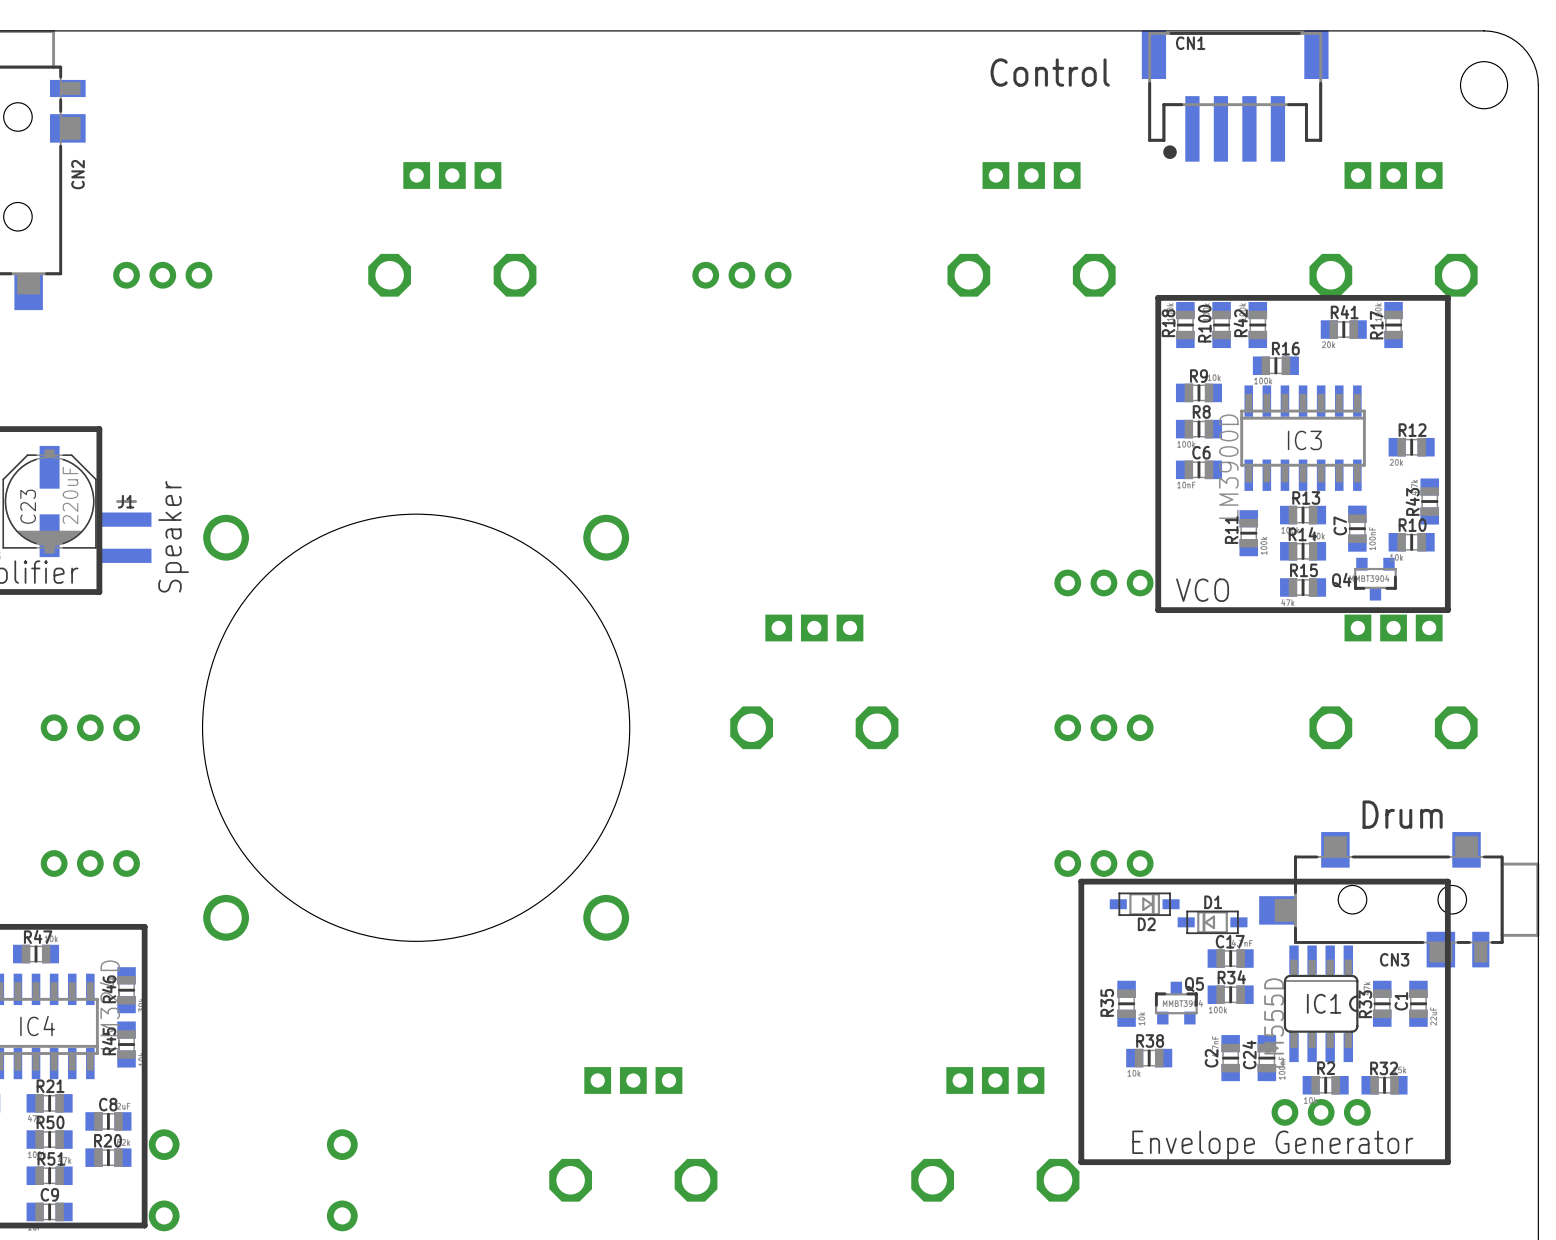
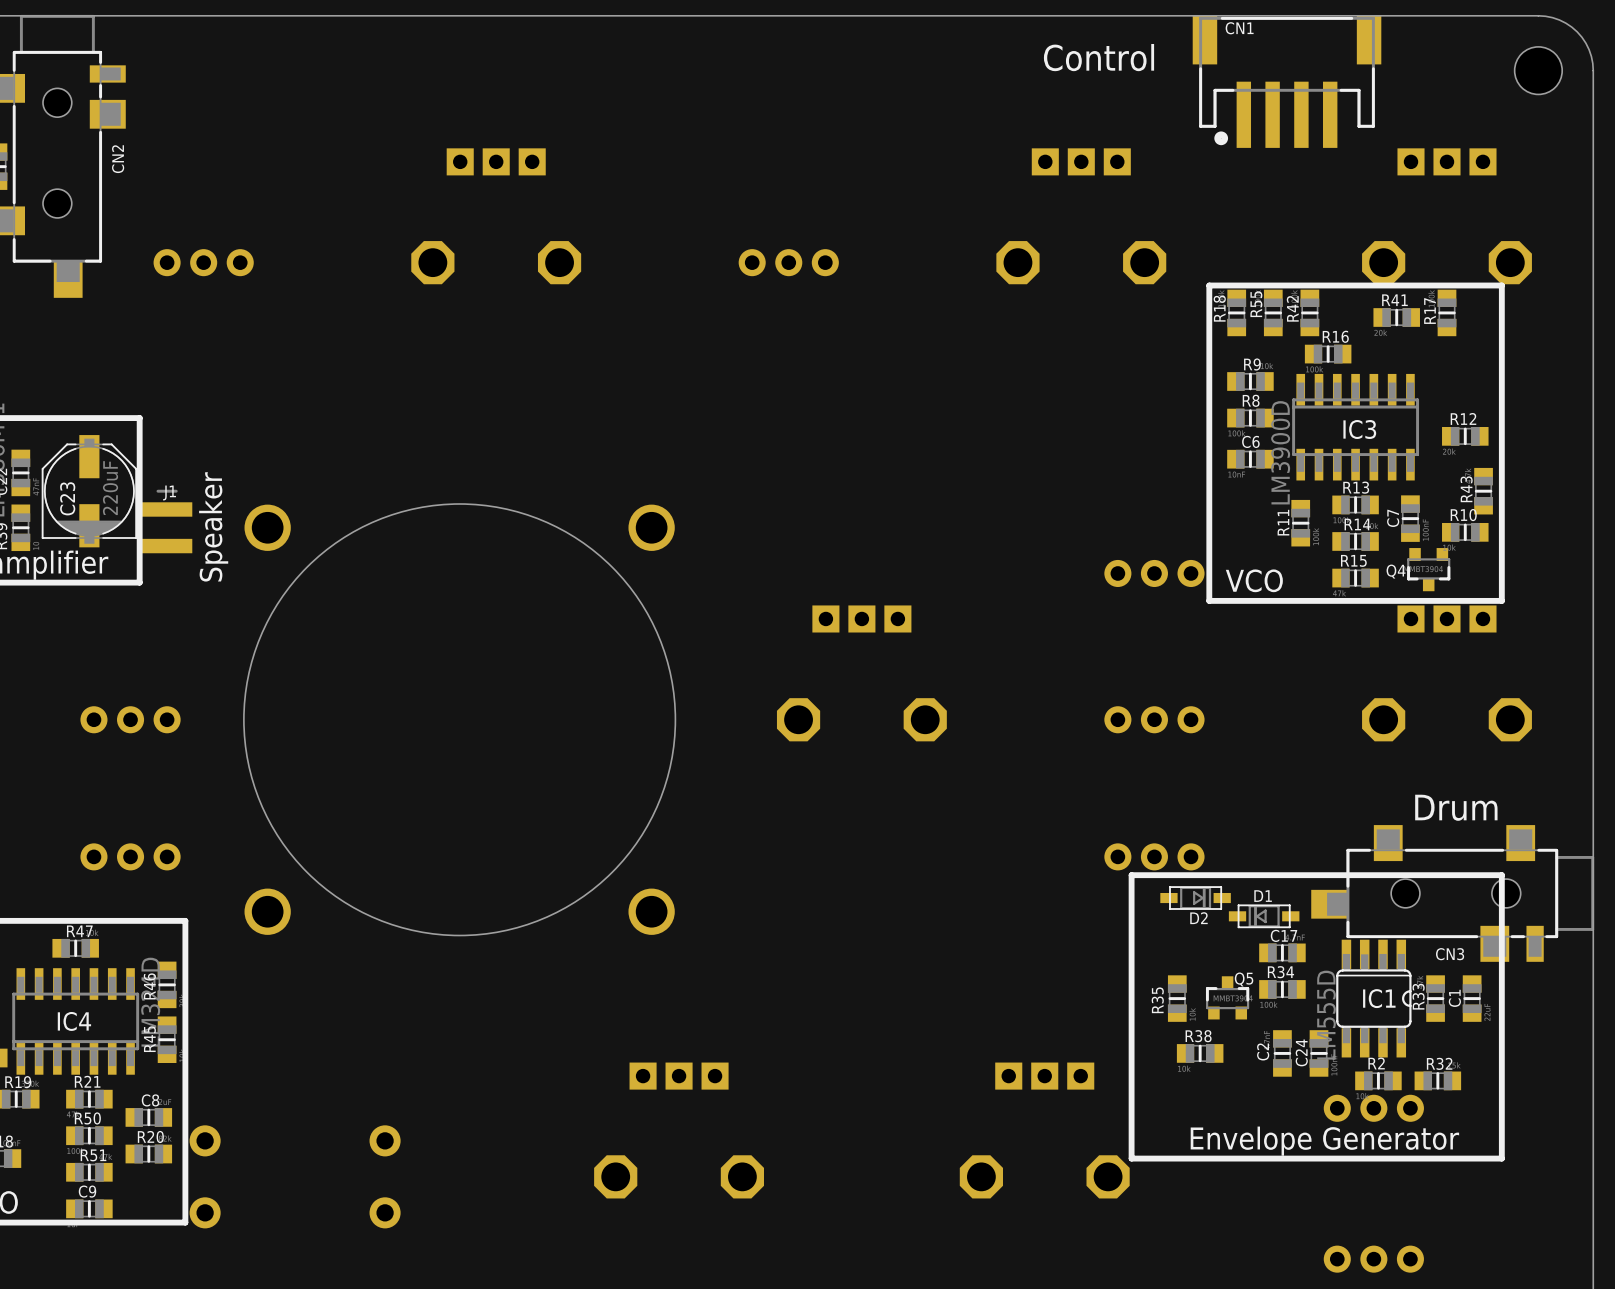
R100 name: R100 (1204, 323) -> R55 (1256, 304)

